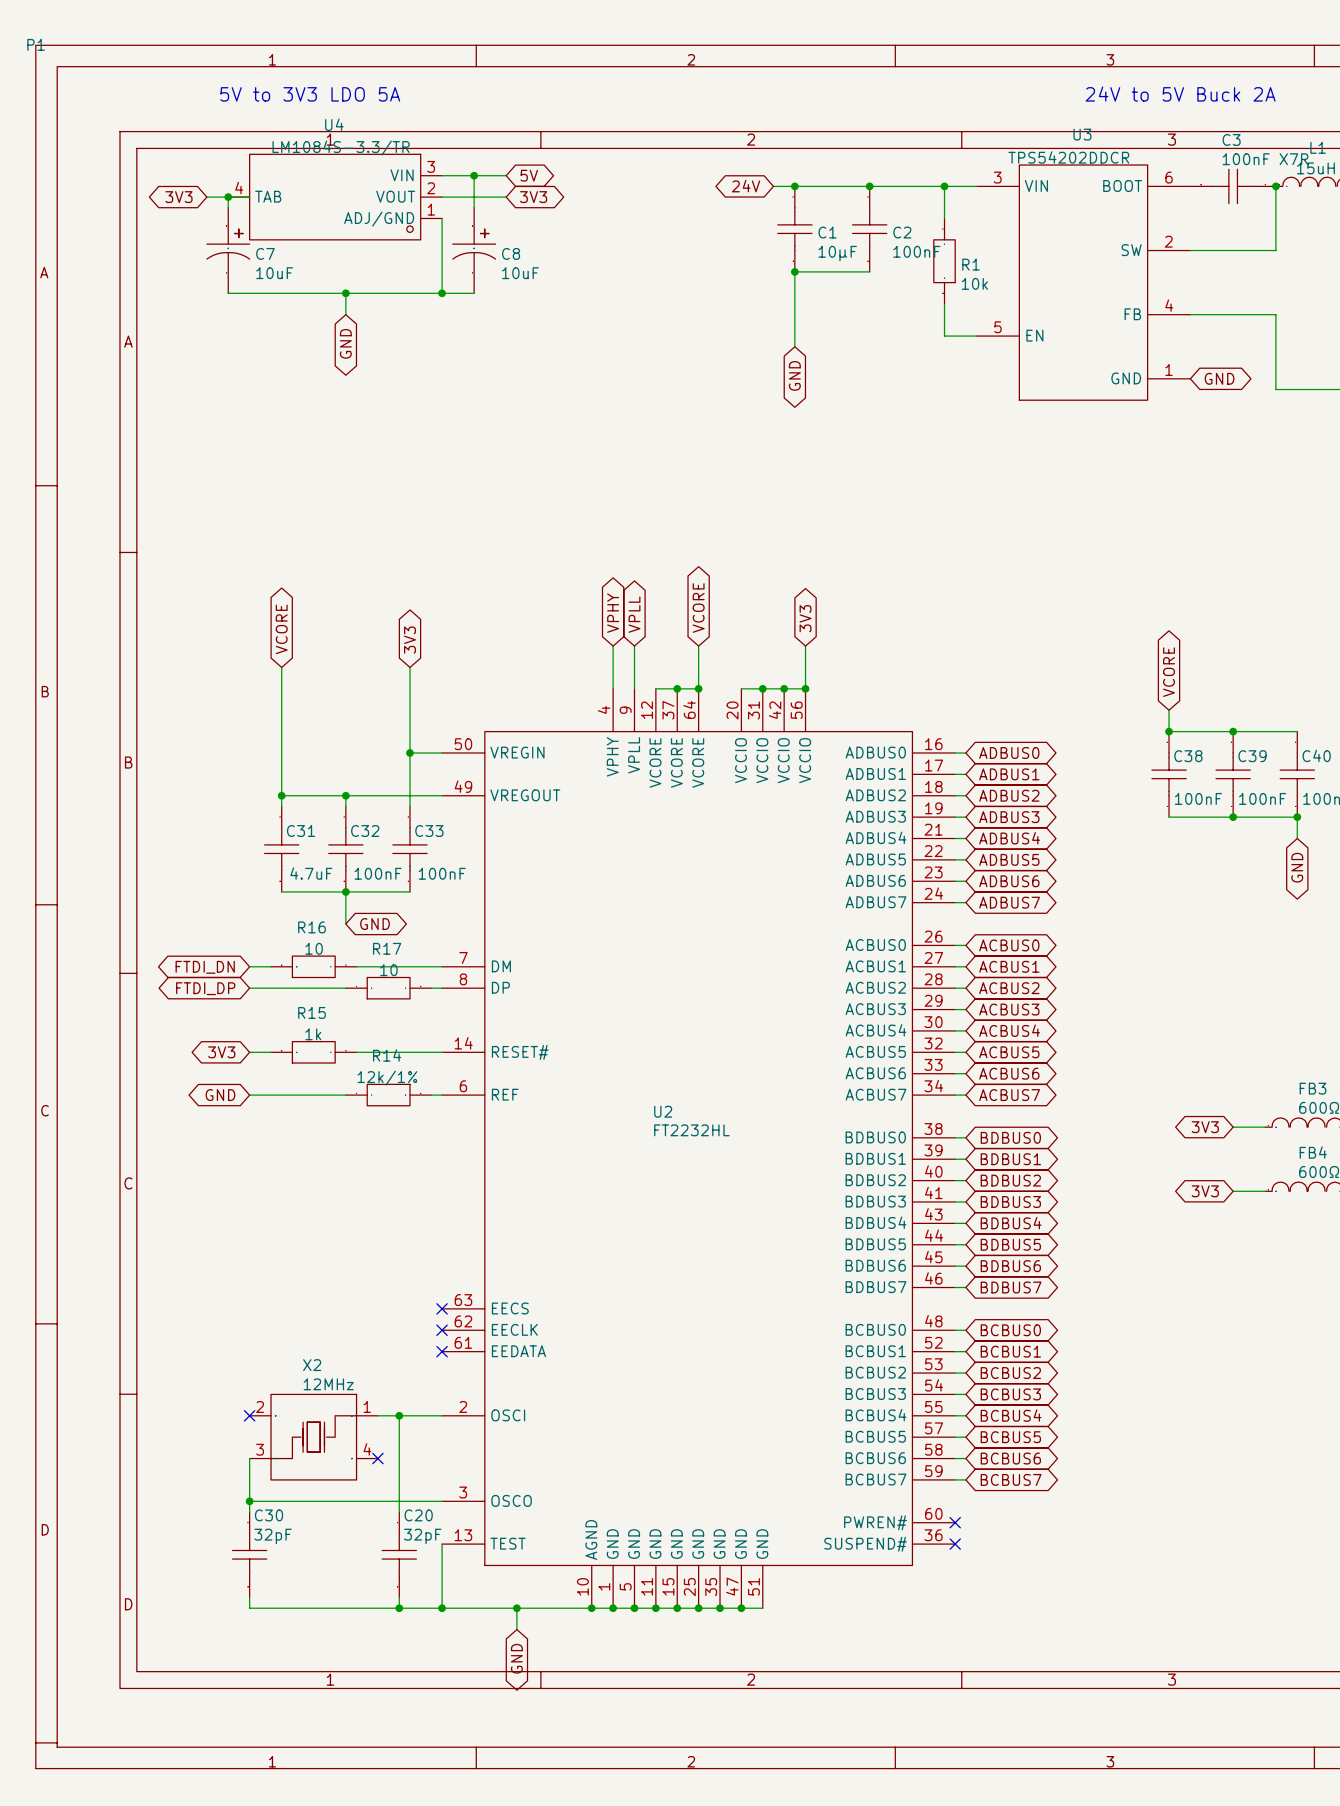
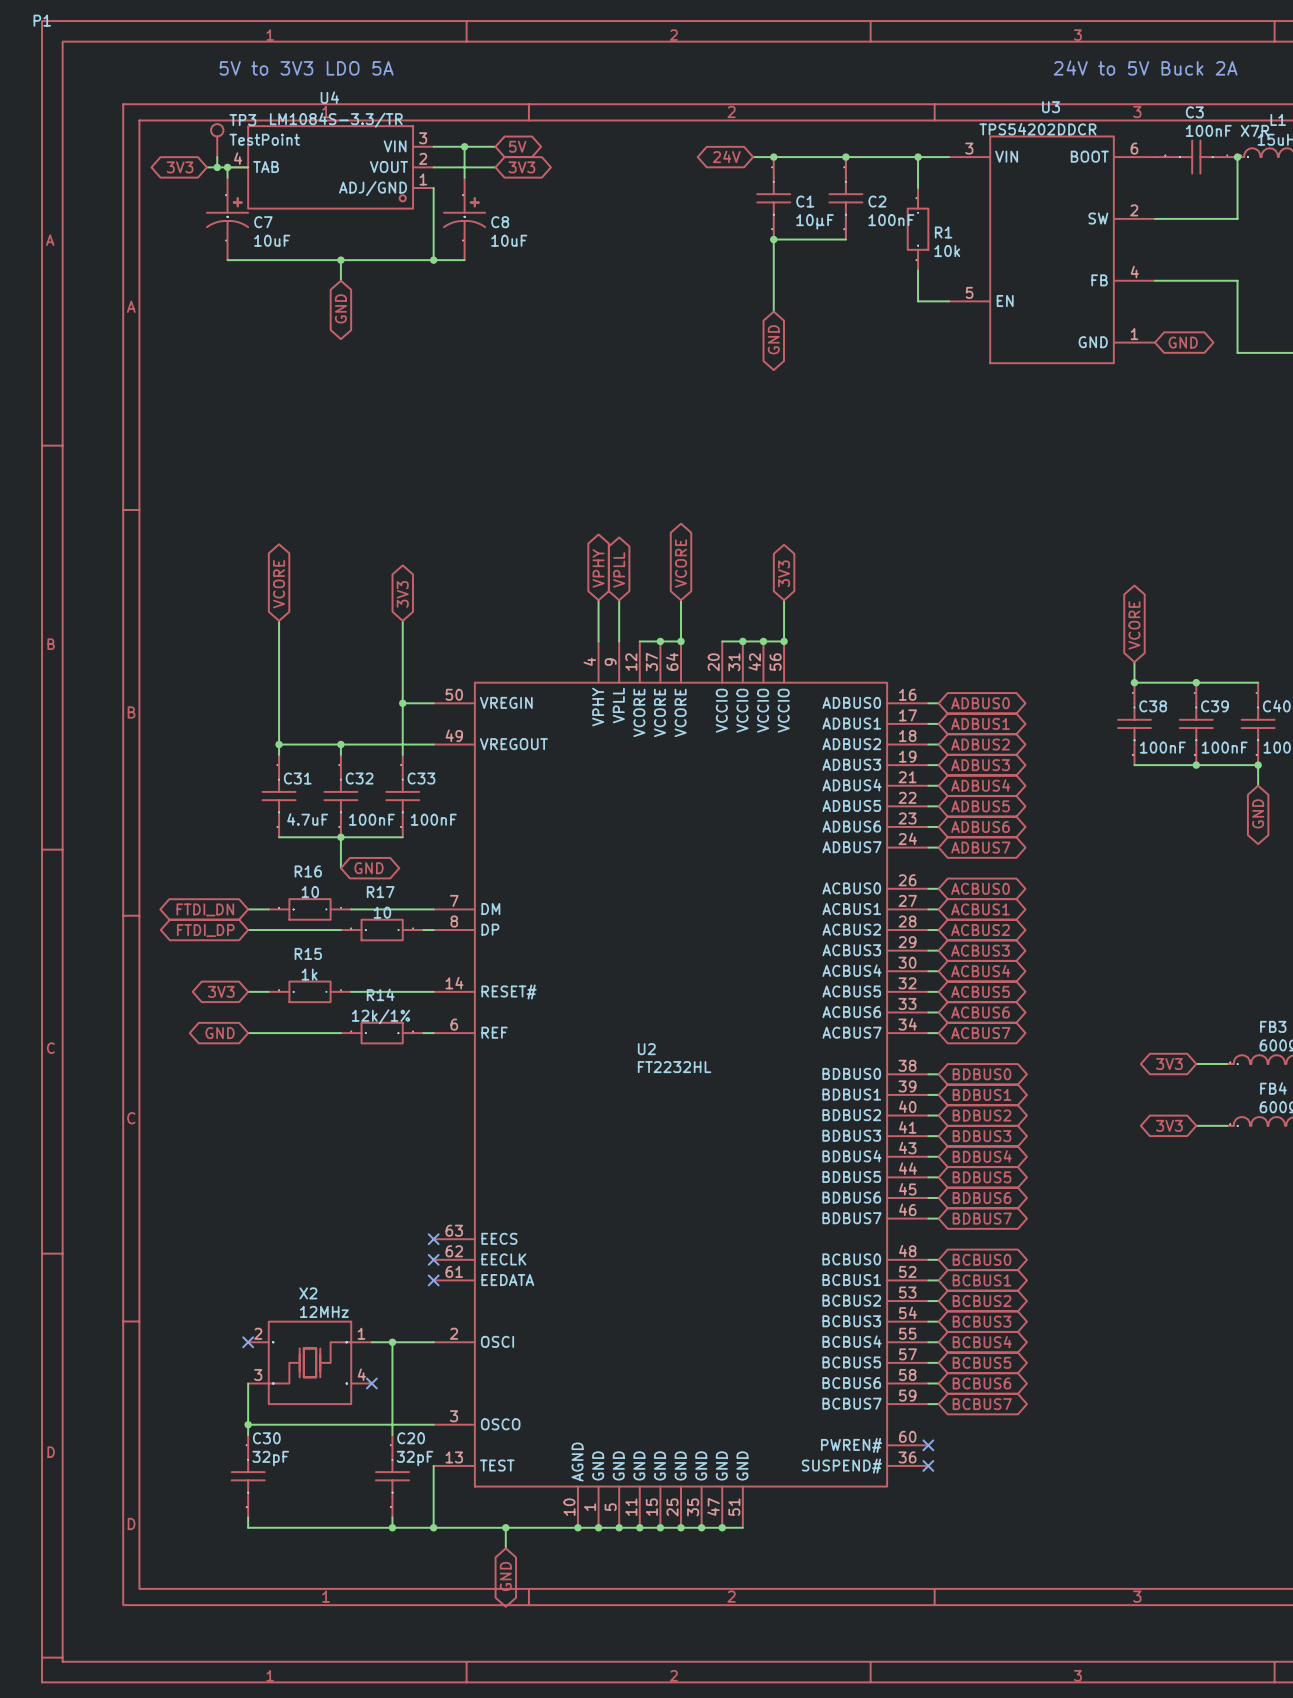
TP3: none -> TestPoint (217, 140)
wire: none -> (217, 157) (217, 167)
junction: none -> (217, 167)

